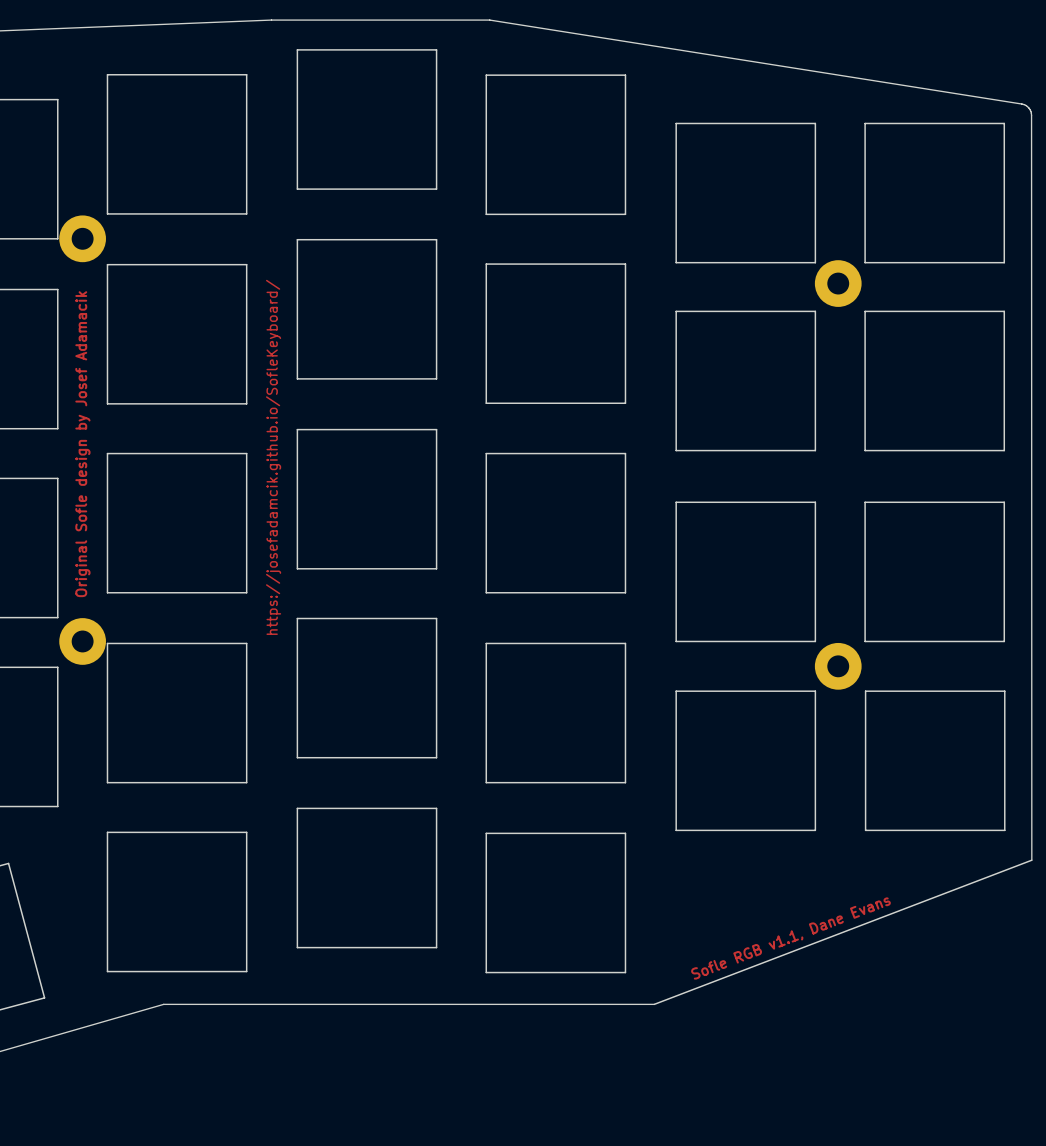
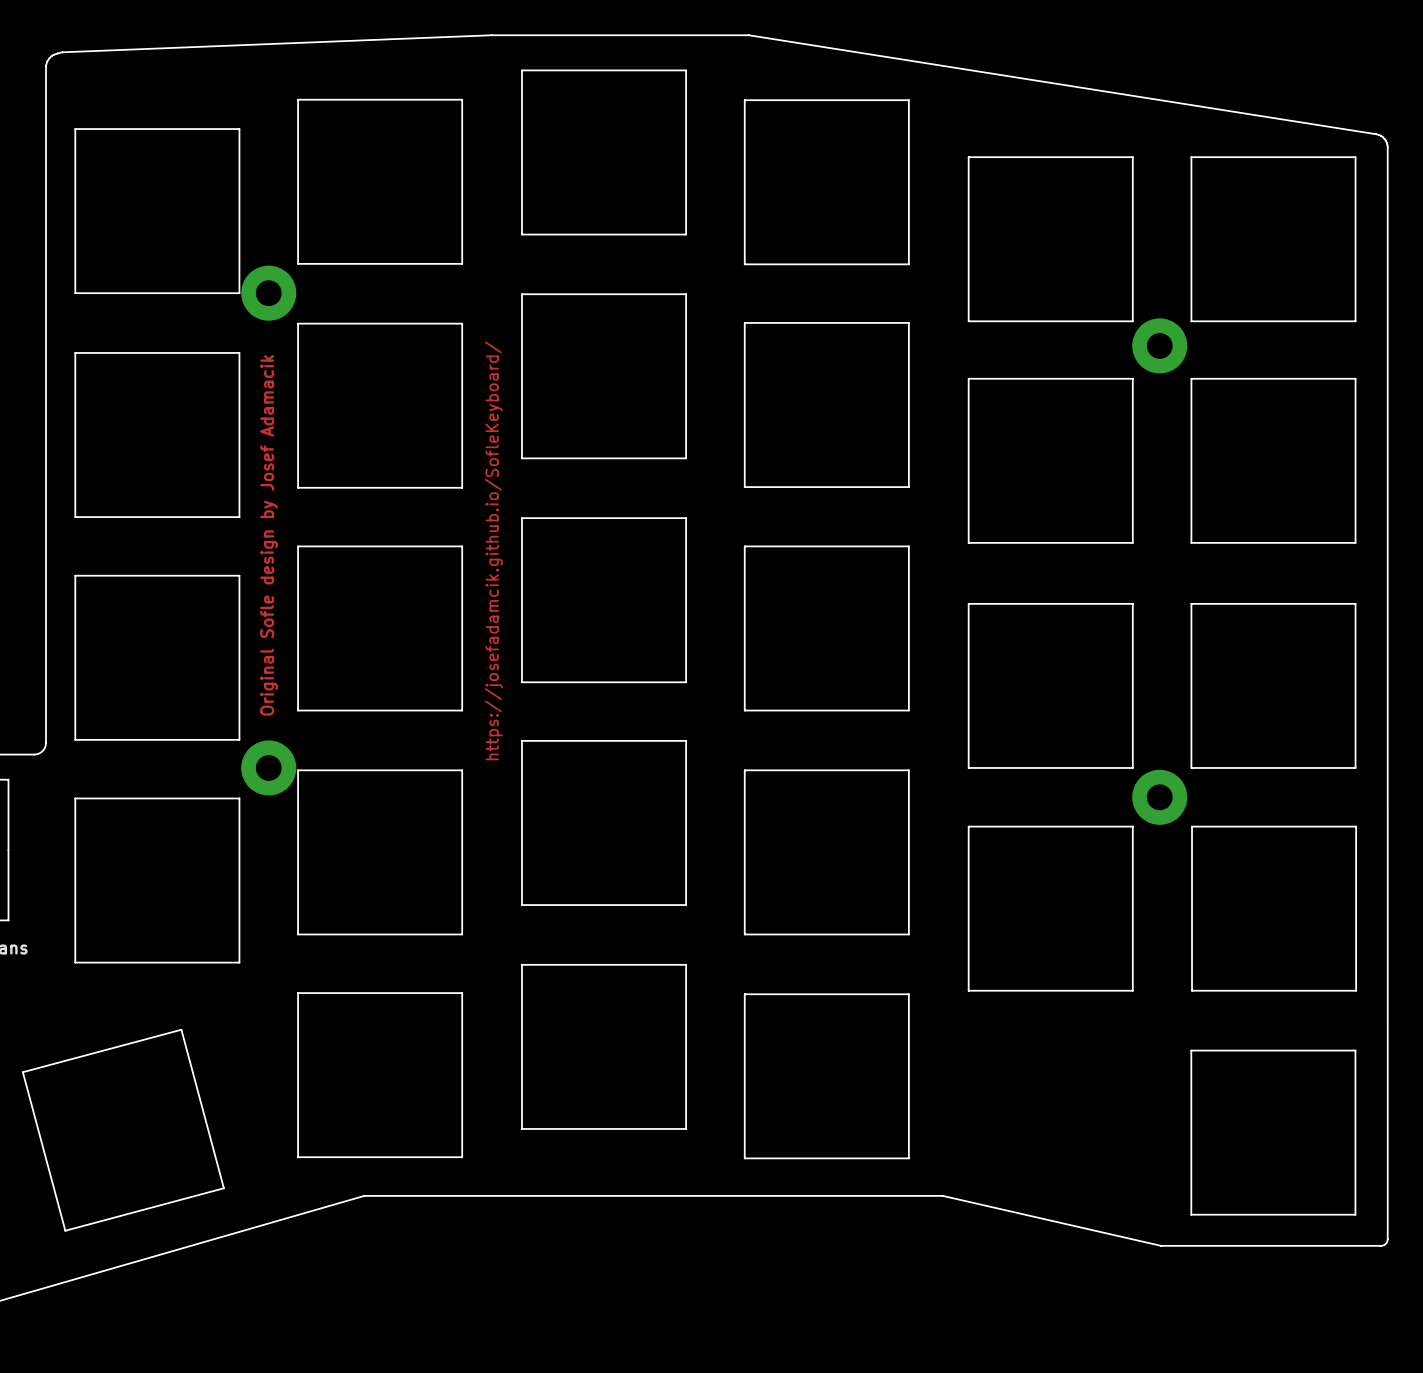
board edge: (1031, 115) (1031, 860) (654, 1004) -> (1387, 147) (1387, 1242) (1381, 1245) (1161, 1245) (942, 1195)
board edge: none -> (1191, 1050) (1355, 1050) (1355, 1214) (1191, 1214) (1191, 1050)
text: Sofle RGB v1.1, Dane Evans (790, 938) -> none

